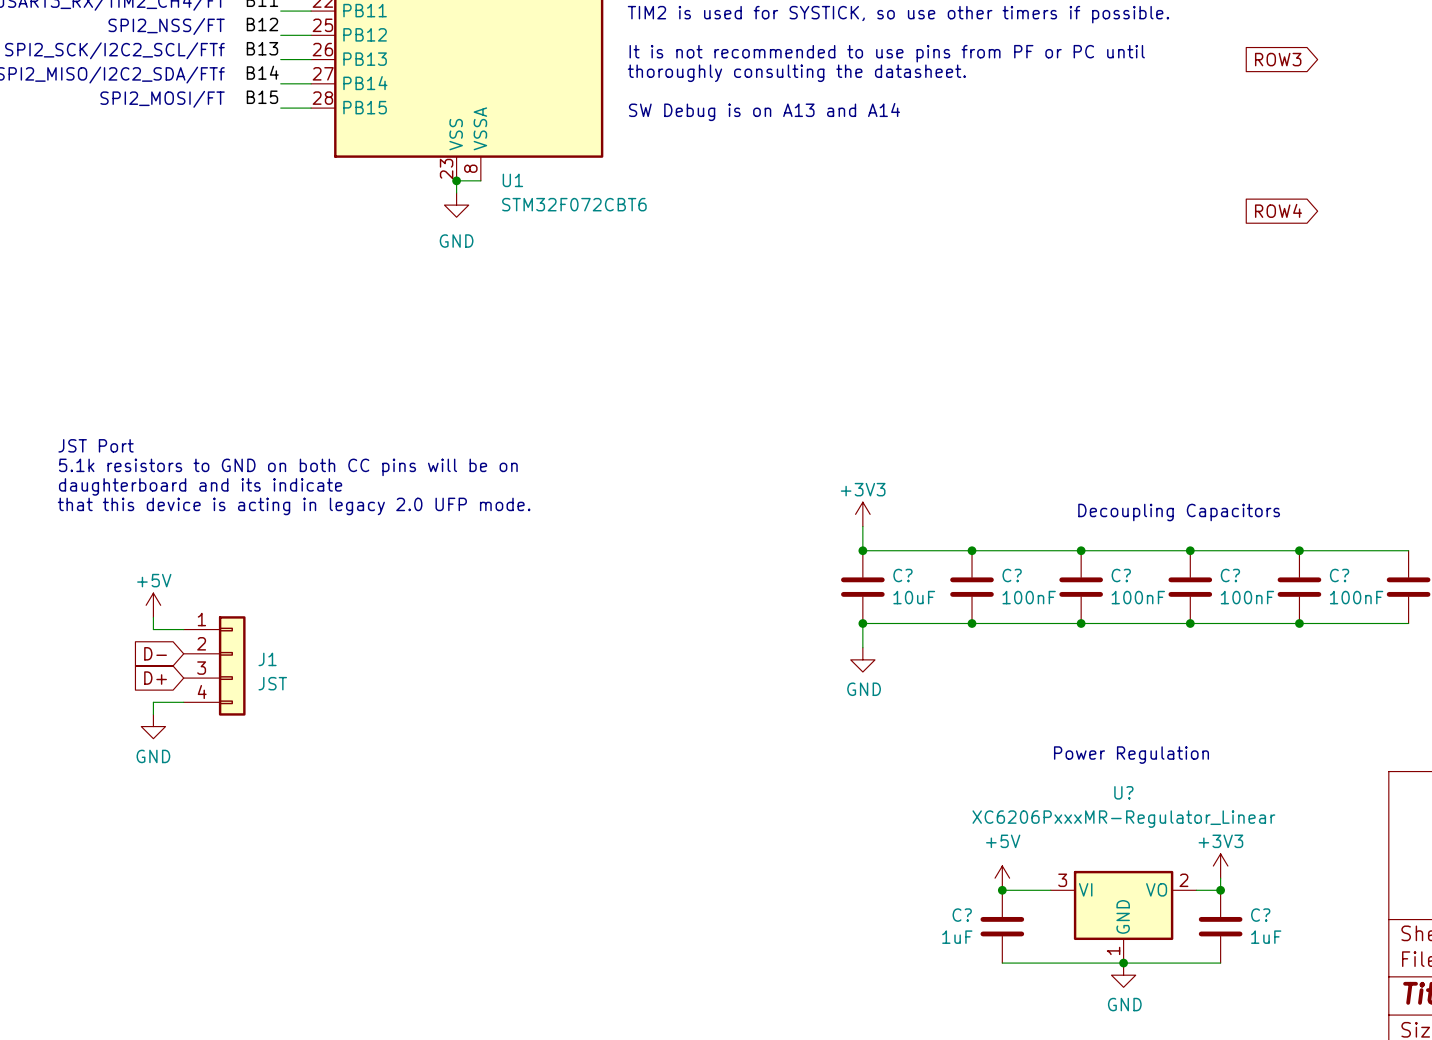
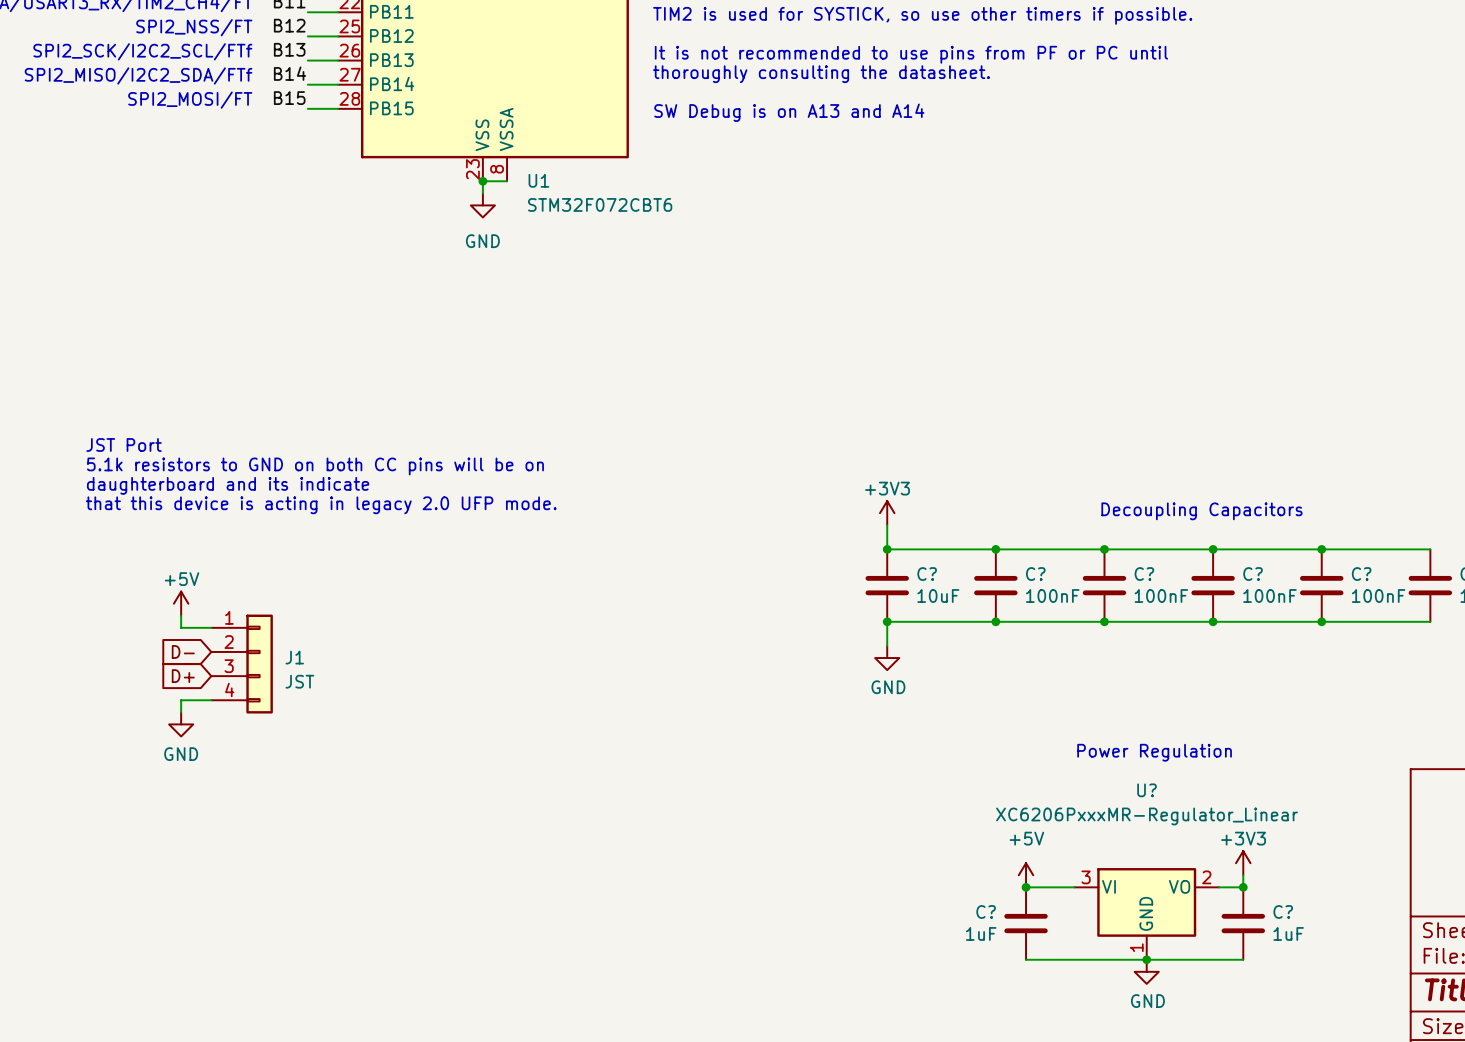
global label: ROW3 (1278, 59) -> none
global label: ROW4 (1278, 210) -> none

